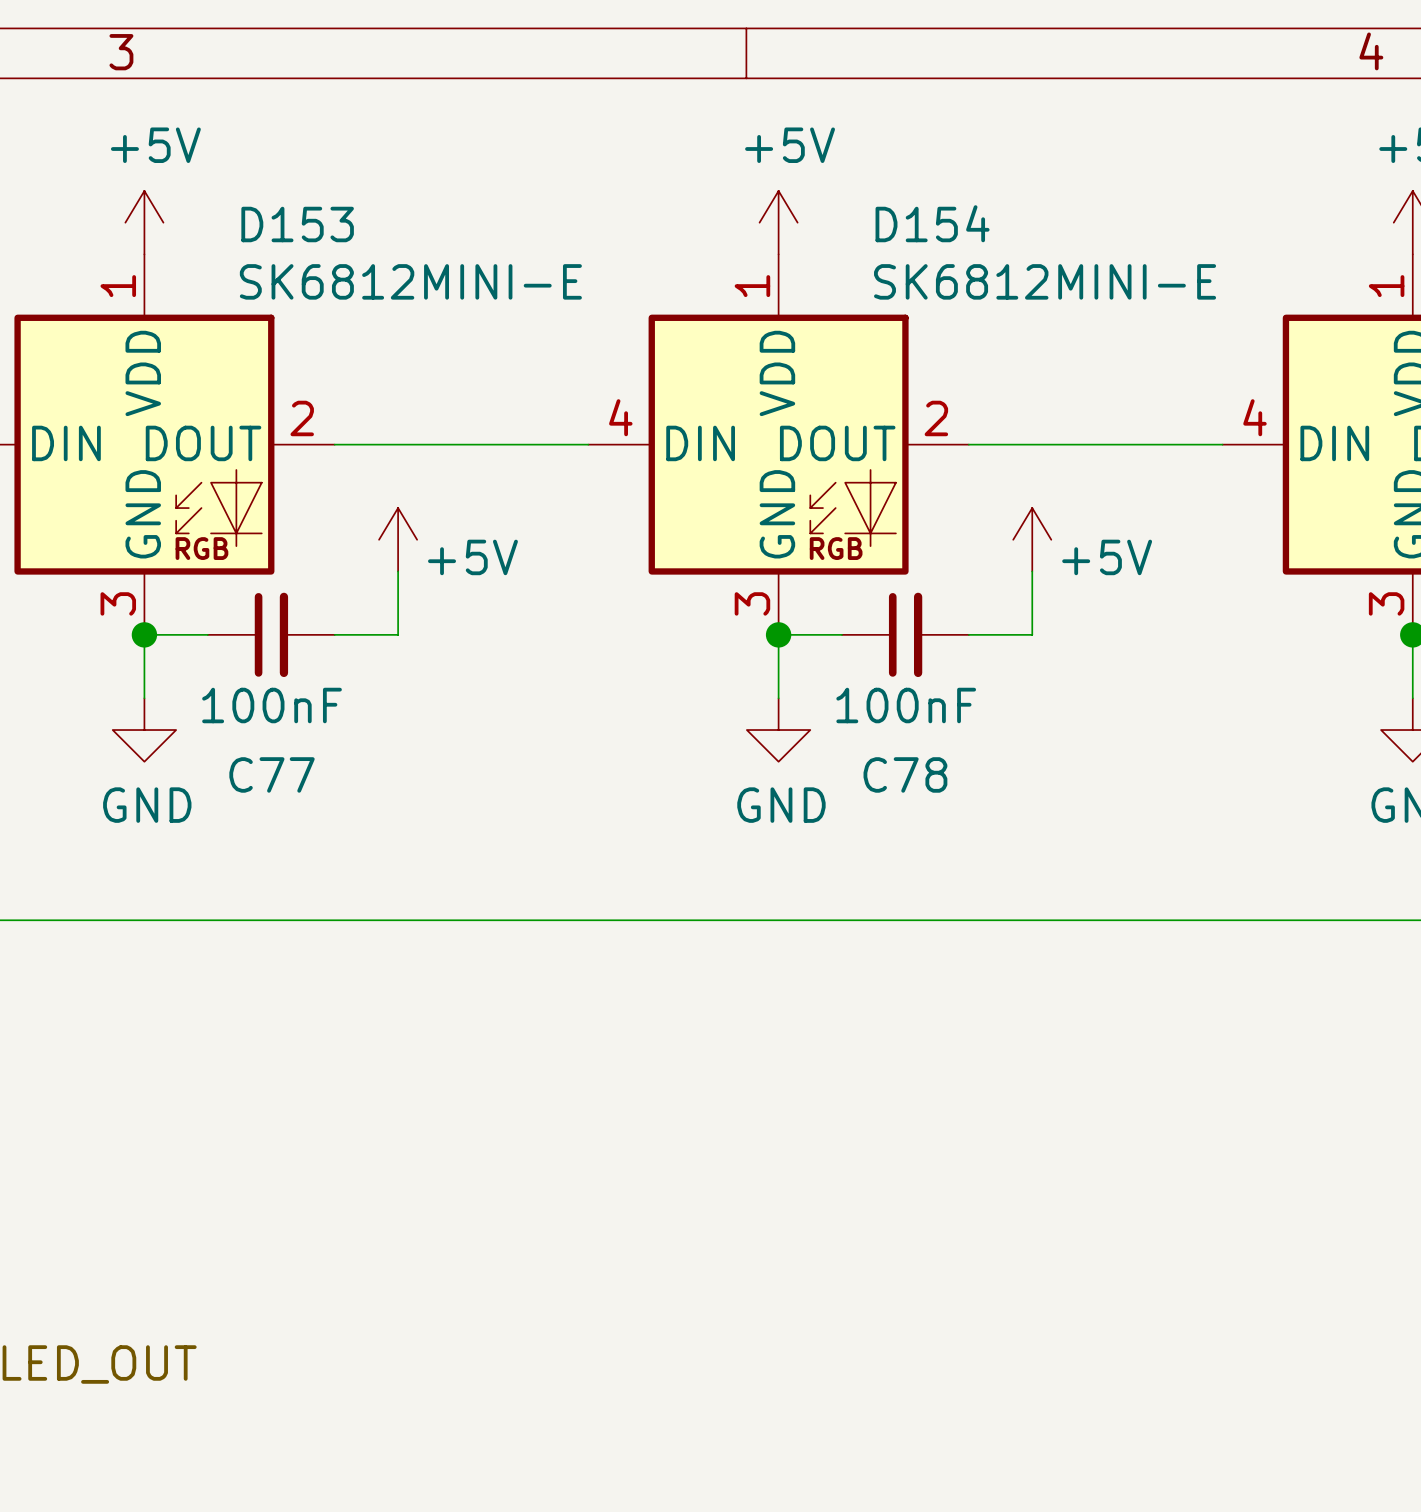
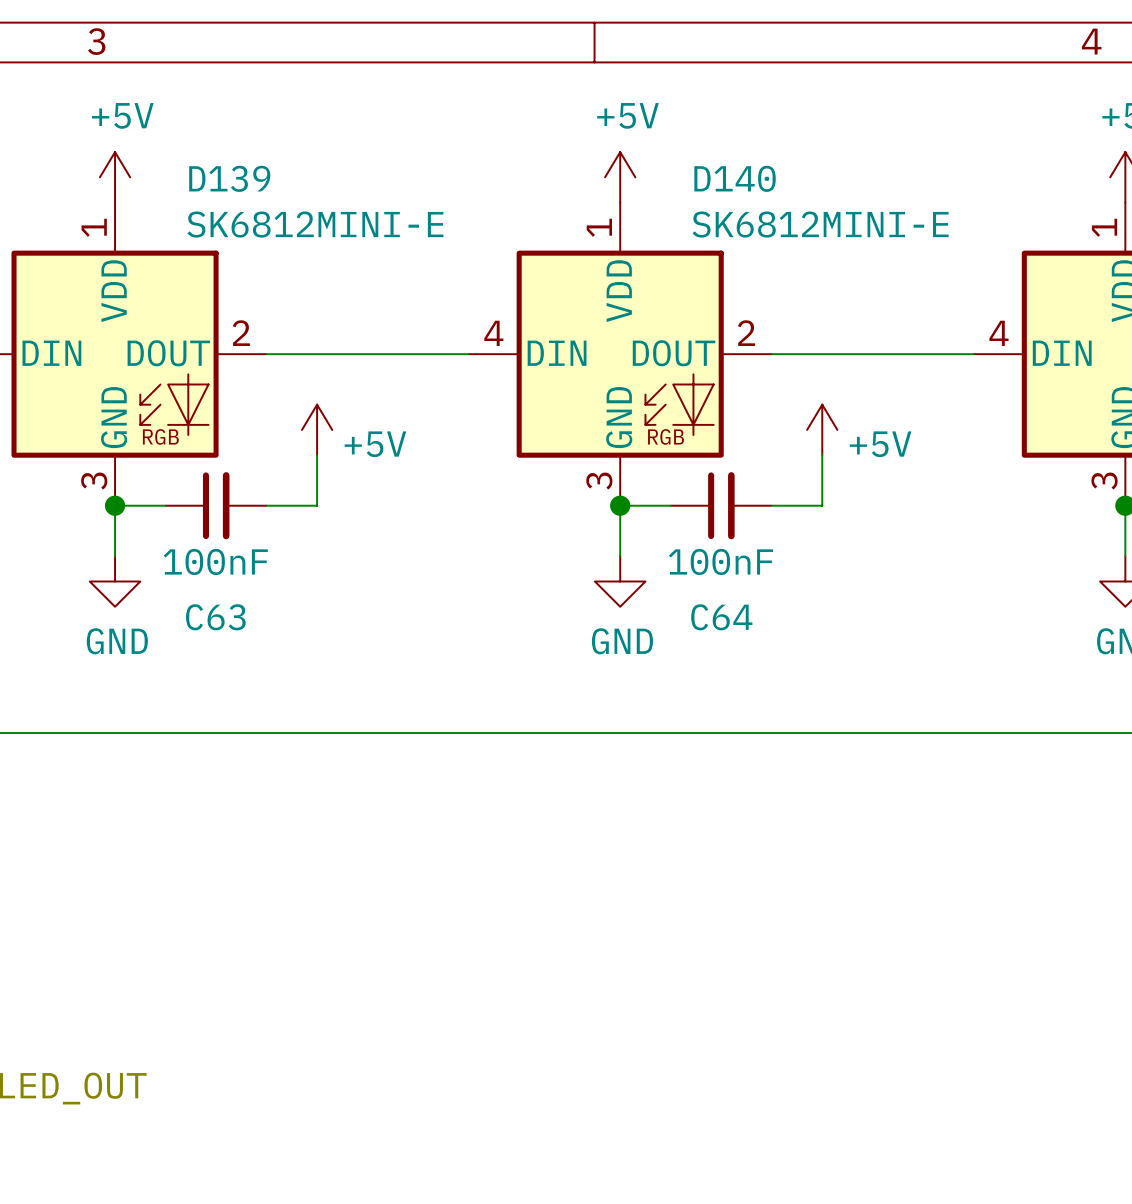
D154 name: D154 (932, 223) -> D140 (735, 178)
D153 name: D153 (297, 224) -> D139 (229, 178)
C77 name: C77 (272, 774) -> C63 (215, 617)
C78 name: C78 (905, 774) -> C64 (721, 617)

